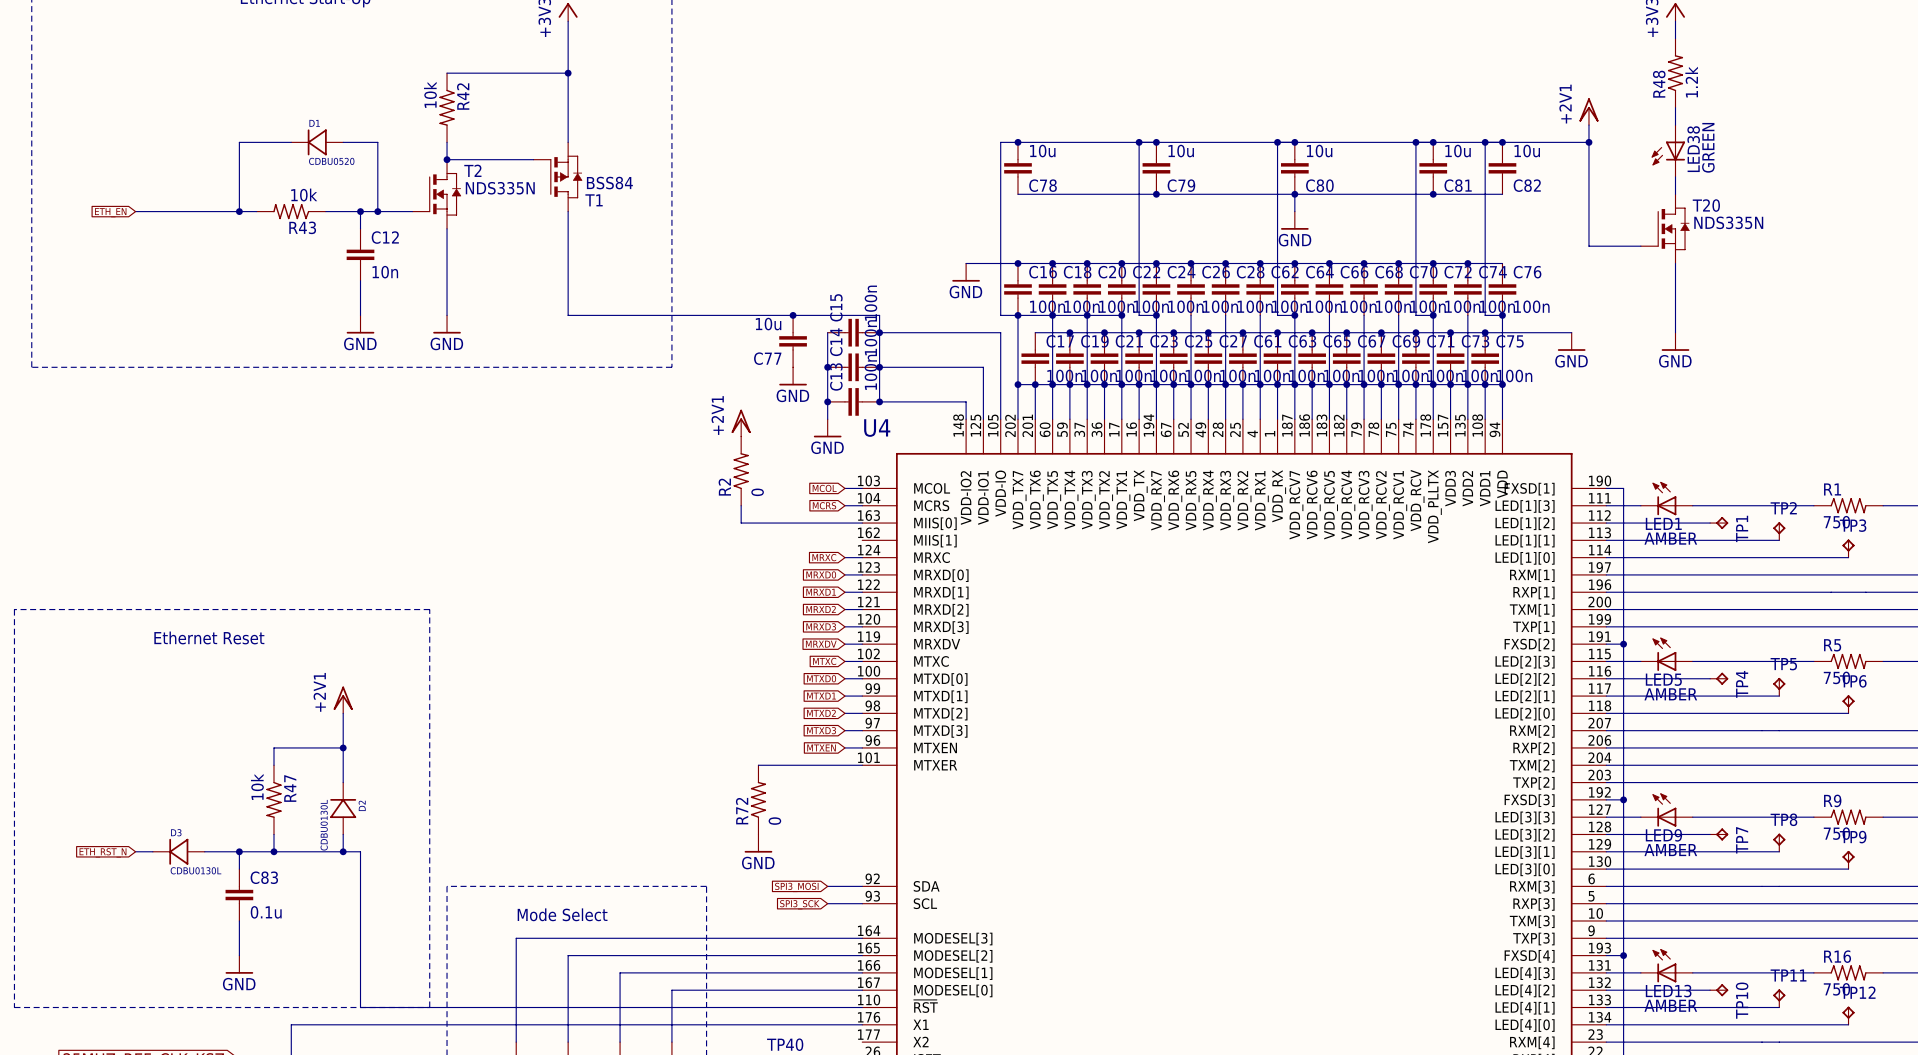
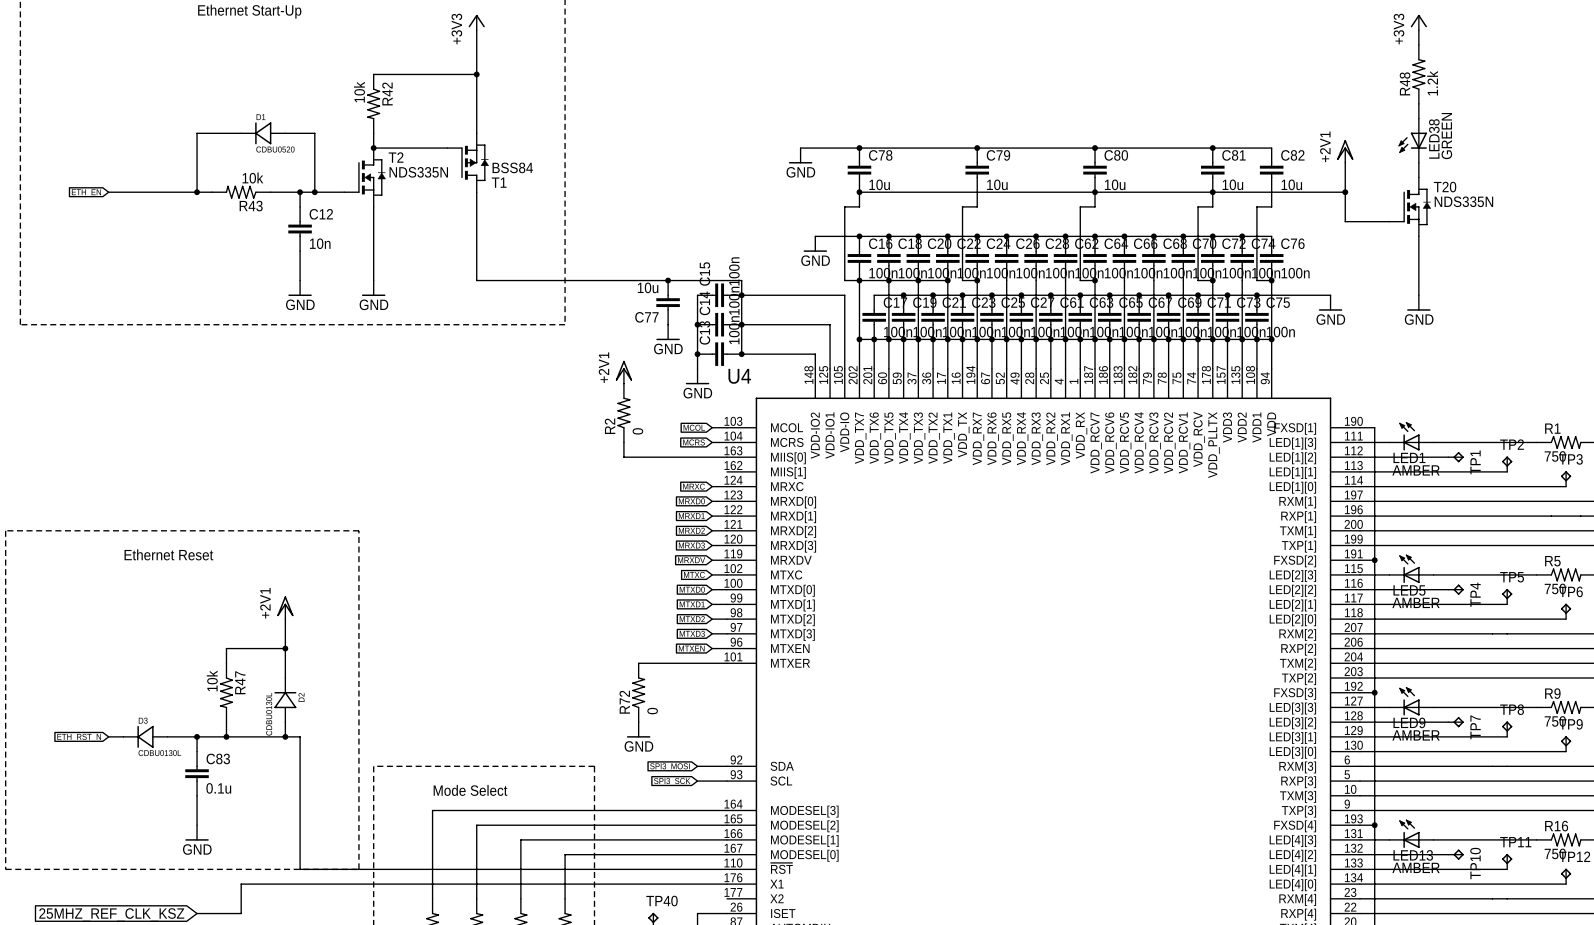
power symbol position: +2V1 (1588, 111) -> +2V1 (1345, 151)
wire: (1588, 125) (1588, 176) -> none
junction position: (1018, 142) -> (859, 148)
wire: (1139, 142) (1139, 228) -> (977, 192) (977, 206) (962, 206)
junction: (1139, 142) -> none
junction: (1156, 142) -> none
wire: (1277, 142) (1277, 228) -> none
junction: (1277, 142) -> none
junction: (1294, 142) -> none
wire: (1415, 142) (1415, 228) -> (1212, 192) (1212, 206) (1198, 206)
junction: (1415, 142) -> none
junction: (1433, 142) -> none
wire: (1485, 142) (1485, 228) -> (1271, 192) (1271, 206) (1256, 206)
junction: (1485, 142) -> none
junction: (1502, 142) -> none
wire: (1588, 142) (1000, 142) (1000, 228) -> (1345, 192) (859, 192) (859, 206) (844, 206)
junction: (1588, 142) -> none
C78 value position: 10u (1042, 151) -> 10u (879, 184)
C79 value position: 10u (1181, 151) -> 10u (997, 184)
C80 value position: 10u (1319, 151) -> 10u (1115, 184)
C81 value position: 10u (1458, 151) -> 10u (1232, 184)
C82 value position: 10u (1527, 151) -> 10u (1291, 184)
wire: none -> (800, 148) (1271, 148)
junction: none -> (977, 148)
junction: none -> (1095, 148)
junction: none -> (1212, 148)
power symbol: none -> GND (800, 155)
C78 position: (1018, 168) -> (859, 170)
C79 position: (1156, 168) -> (977, 170)
C80 position: (1294, 168) -> (1095, 170)
C81 position: (1433, 168) -> (1212, 170)
C82 position: (1502, 168) -> (1271, 170)
C78 name position: C78 (1043, 185) -> C78 (880, 155)
C79 name position: C79 (1181, 185) -> C79 (998, 155)
C80 name position: C80 (1319, 185) -> C80 (1116, 155)
C81 name position: C81 (1458, 185) -> C81 (1233, 155)
C82 name position: C82 (1527, 185) -> C82 (1292, 155)
wire: (1018, 194) (1502, 194) -> none
junction: (1156, 194) -> none
junction: (1294, 194) -> none
junction: (1433, 194) -> none
junction: none -> (859, 192)
junction: none -> (1095, 192)
junction: none -> (1212, 192)
junction: none -> (1345, 192)
power symbol: GND (1294, 220) -> none

